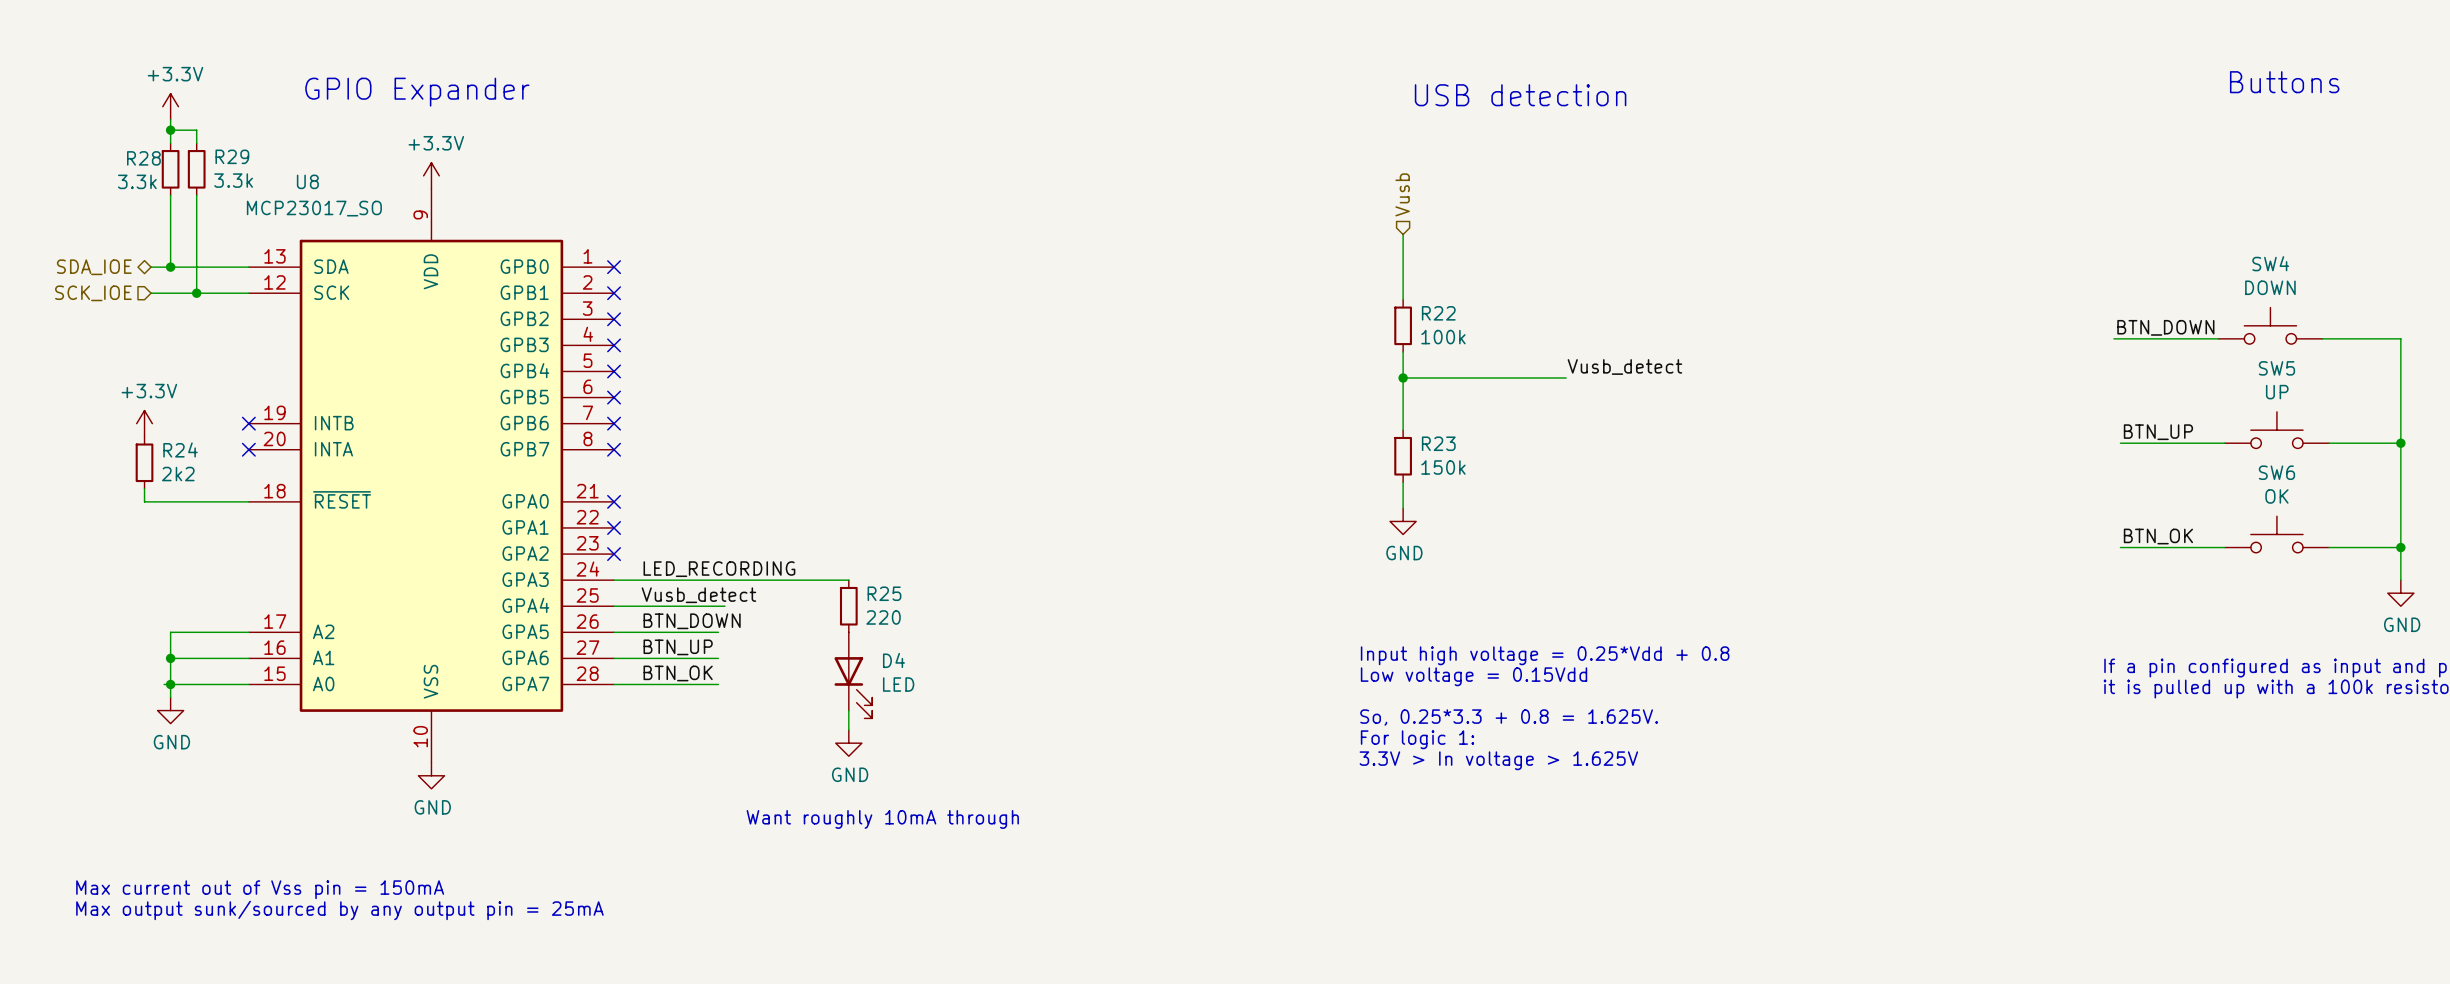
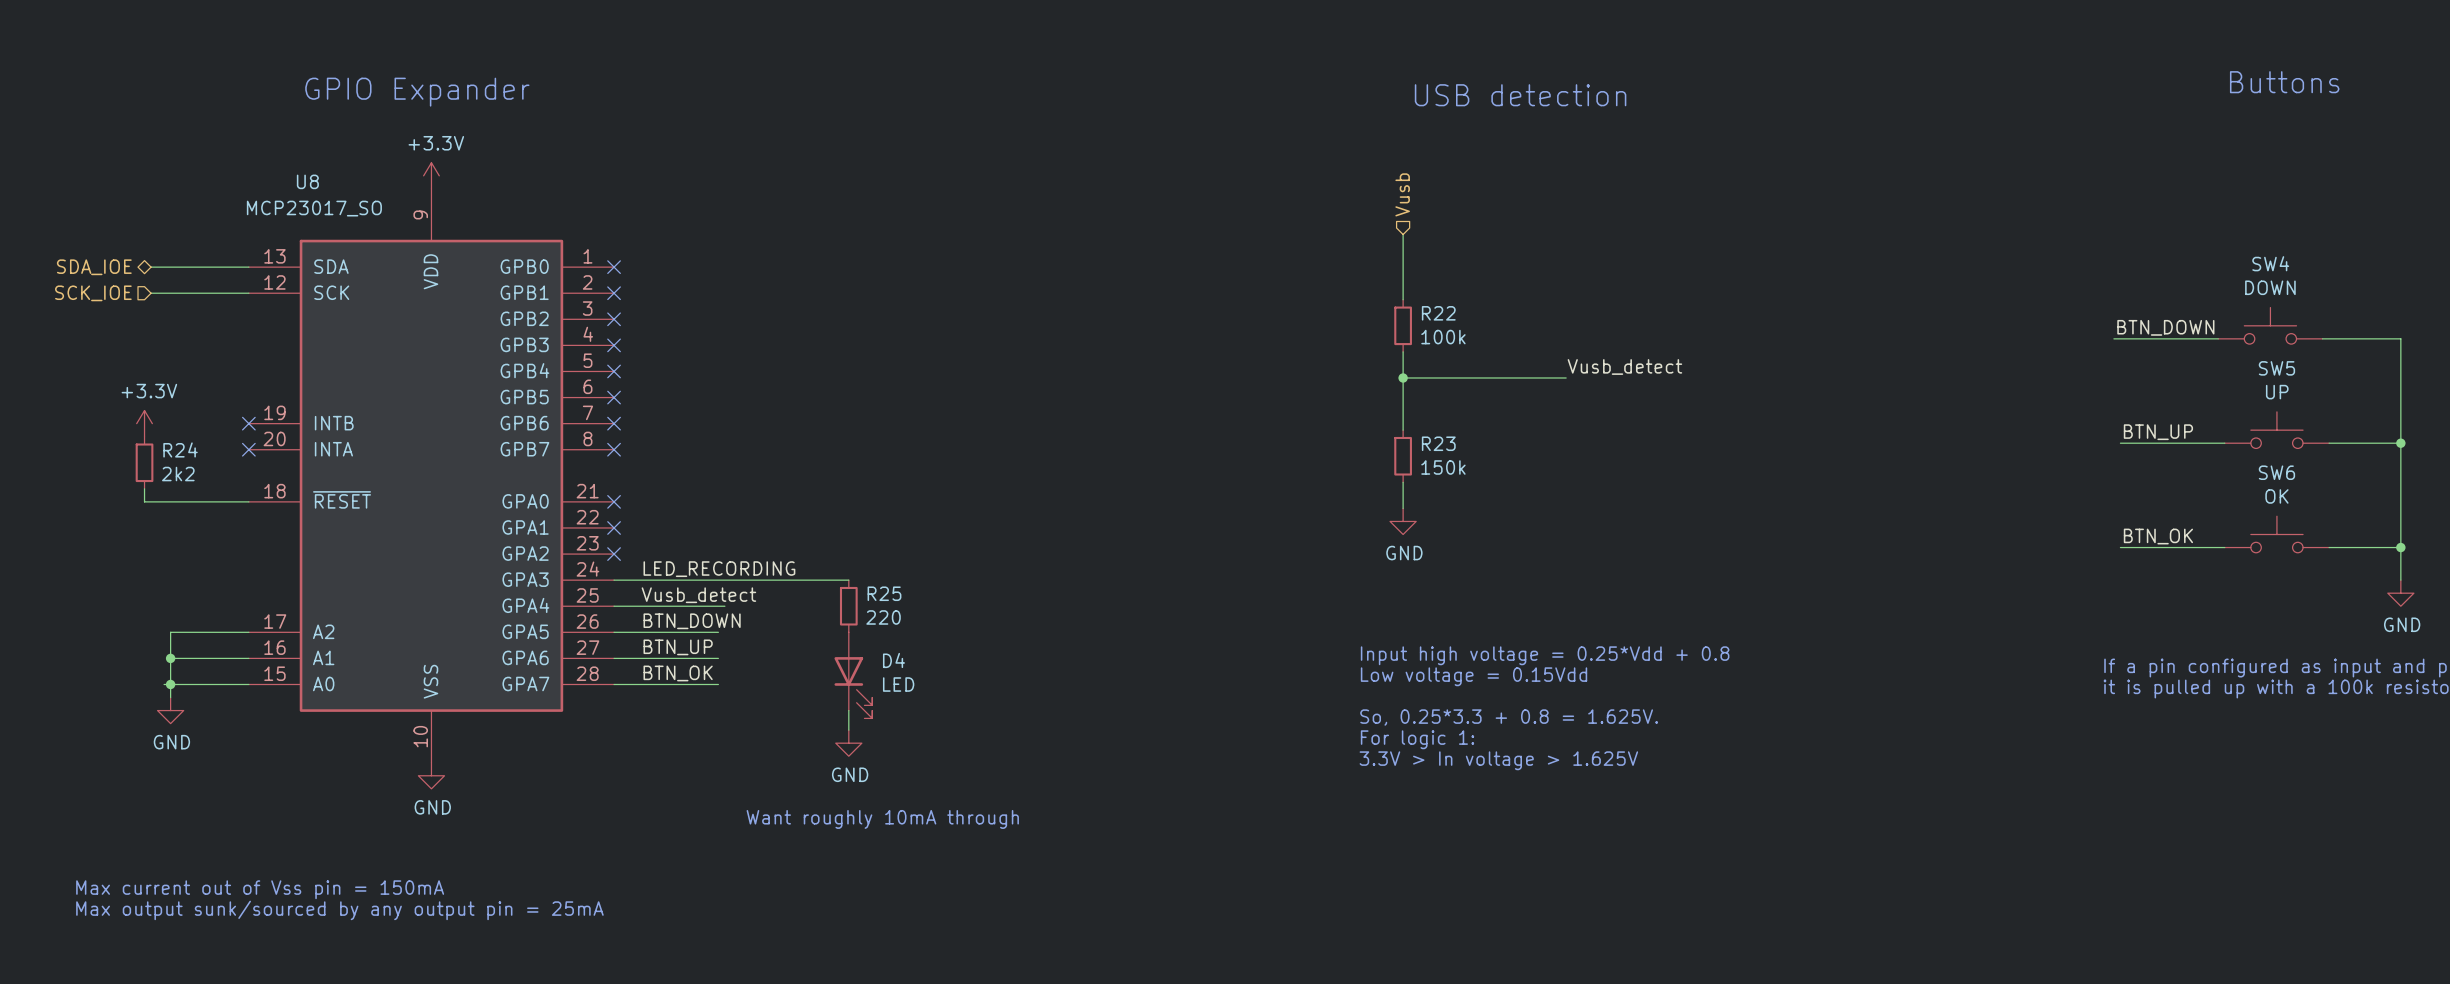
power symbol: +3.3V (170, 106) -> none
wire: (170, 119) (170, 143) -> none
wire: (170, 130) (196, 130) (196, 143) -> none
junction: (170, 130) -> none
R28: 3.3k (170, 169) -> none
R29: 3.3k (196, 169) -> none
wire: (170, 195) (170, 267) -> none
wire: (196, 195) (196, 293) -> none
junction: (170, 267) -> none
junction: (196, 293) -> none

